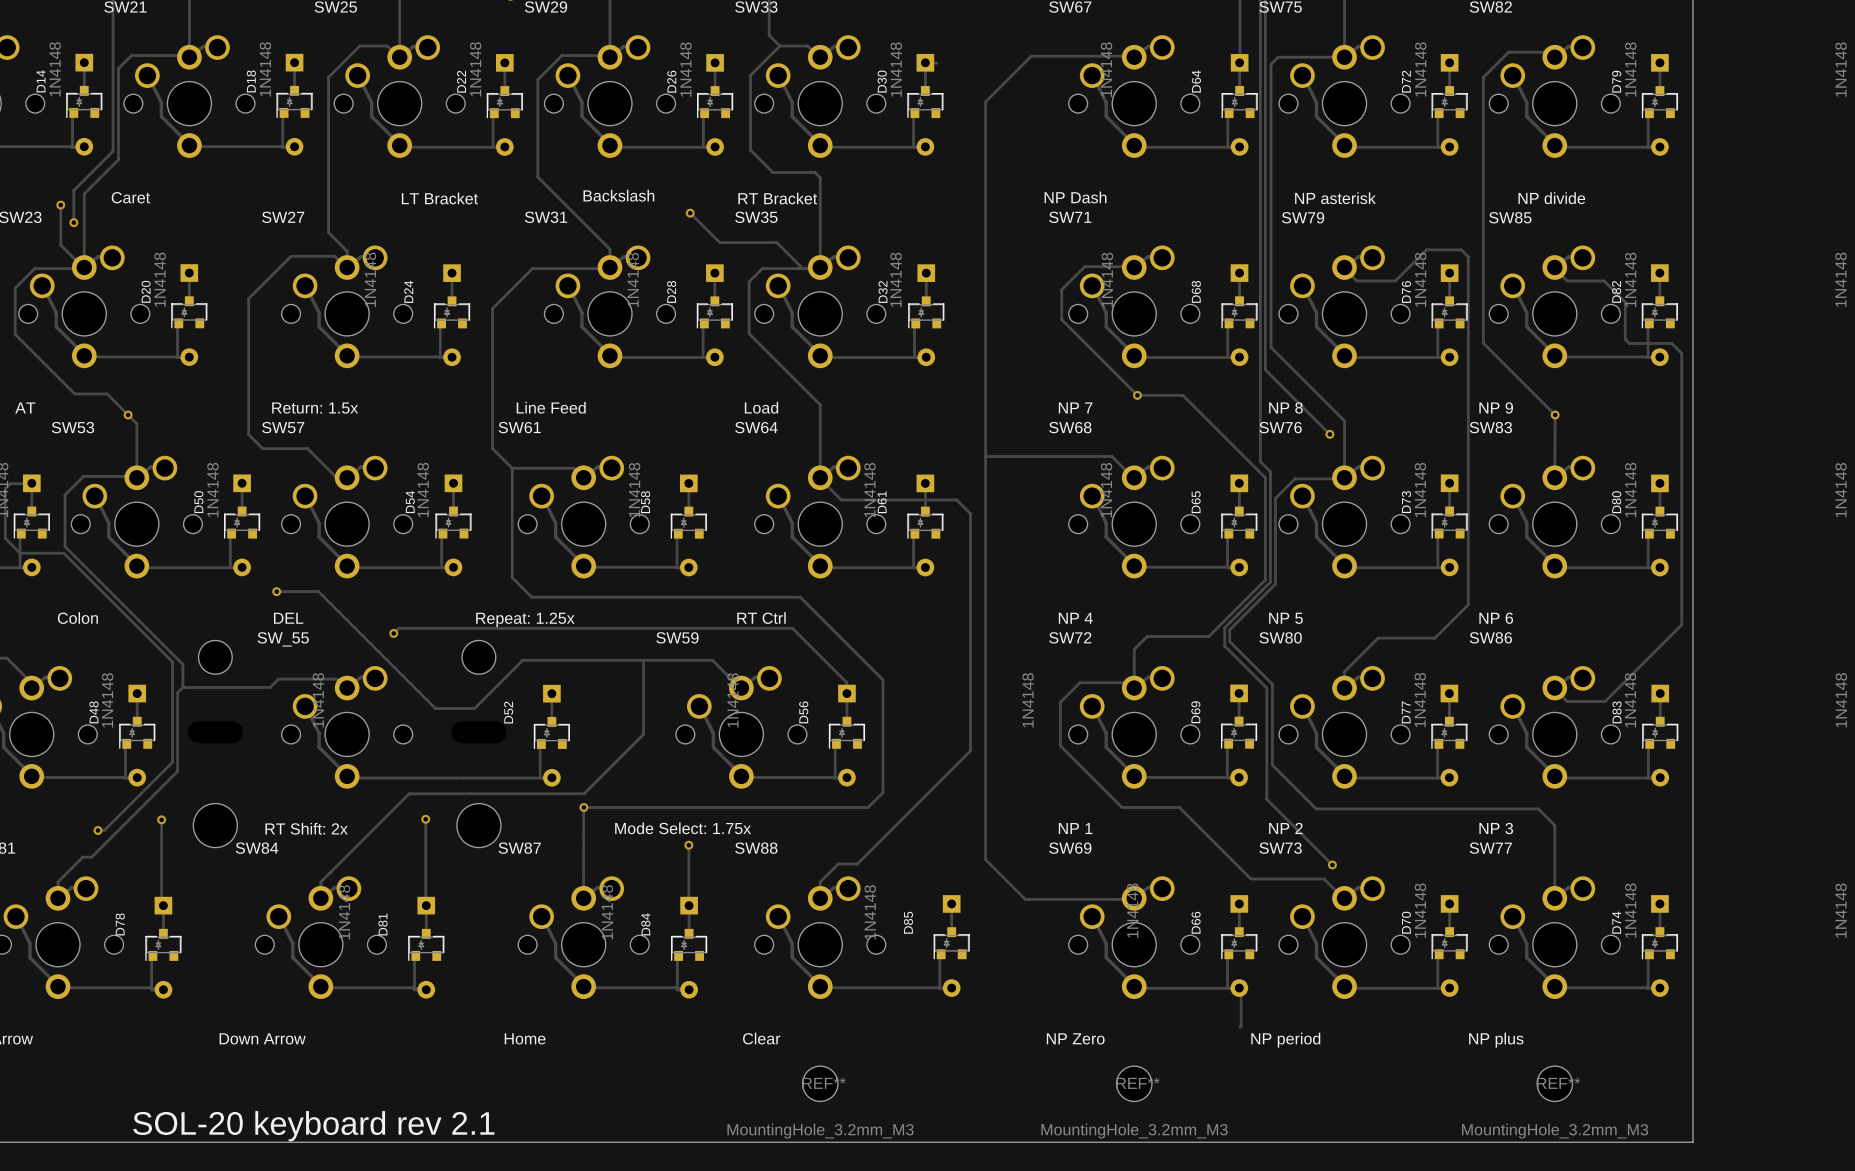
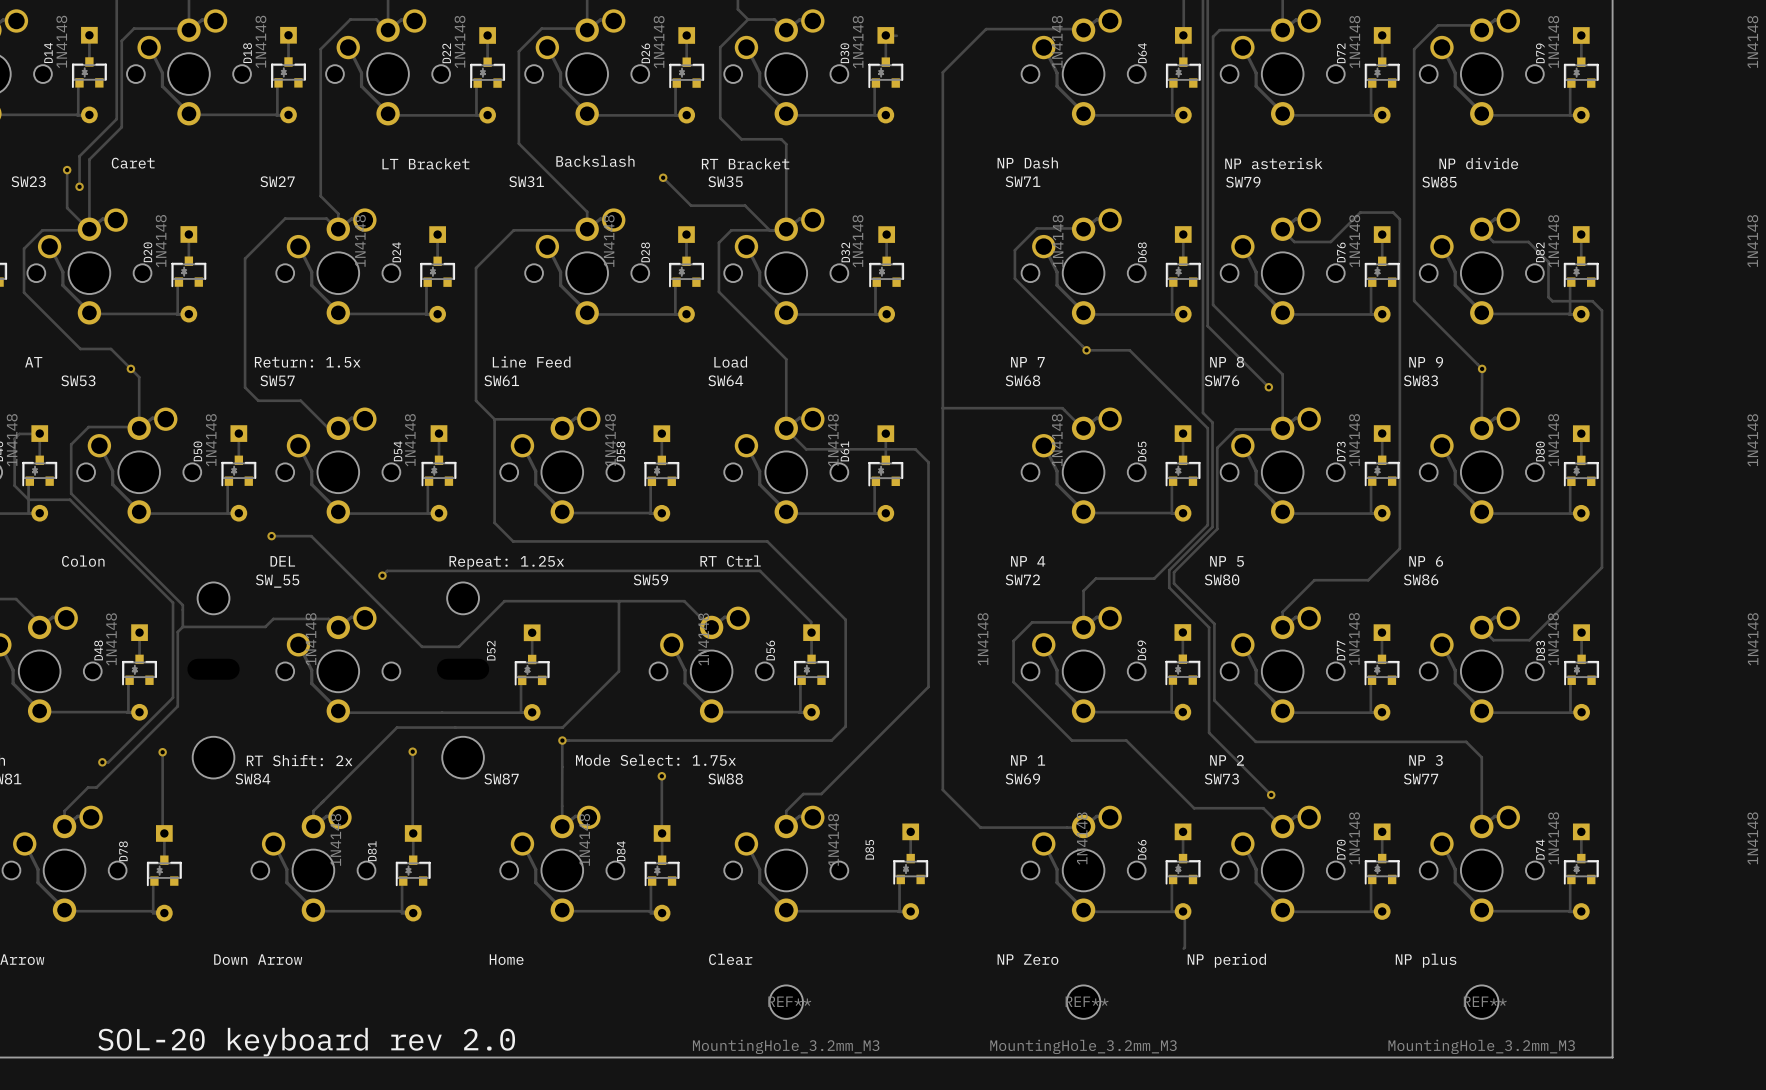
text: SOL-20 keyboard rev 2.1 (313, 1126) -> SOL-20 keyboard rev 2.0 (306, 1042)

